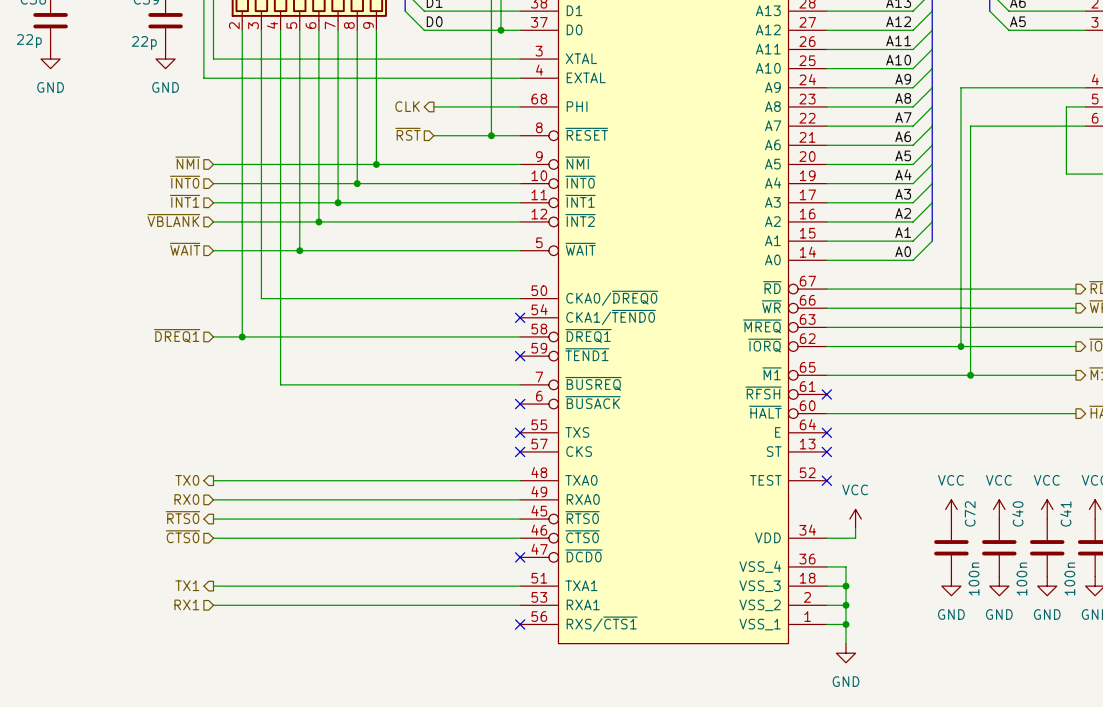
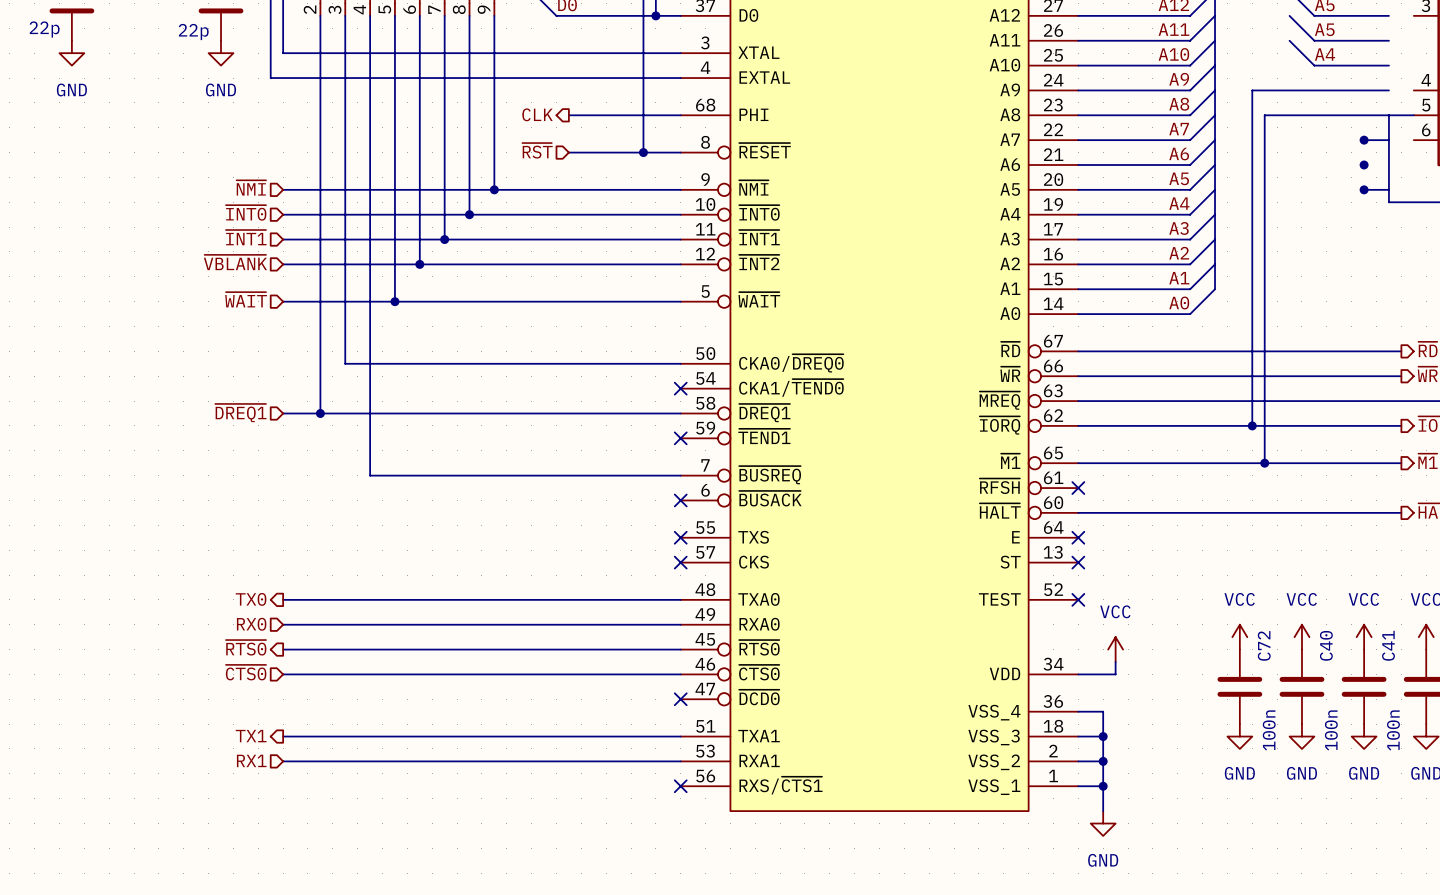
wire: none -> (1289, 15) (1314, 40) (1388, 40)
wire: (1066, 30) (1085, 30) -> none
label: none -> A5 (1324, 29)
wire: none -> (1289, 40) (1314, 65) (1388, 65)
label: none -> A4 (1325, 54)
wire: (1066, 87) (1085, 87) -> none
wire: (970, 126) (1047, 126) -> (1264, 140) (1264, 115) (1388, 115)
junction: none -> (1364, 140)
wire: (1066, 126) (1085, 126) -> (1364, 189) (1388, 189)
junction: none -> (1364, 165)
junction: none -> (1364, 189)

